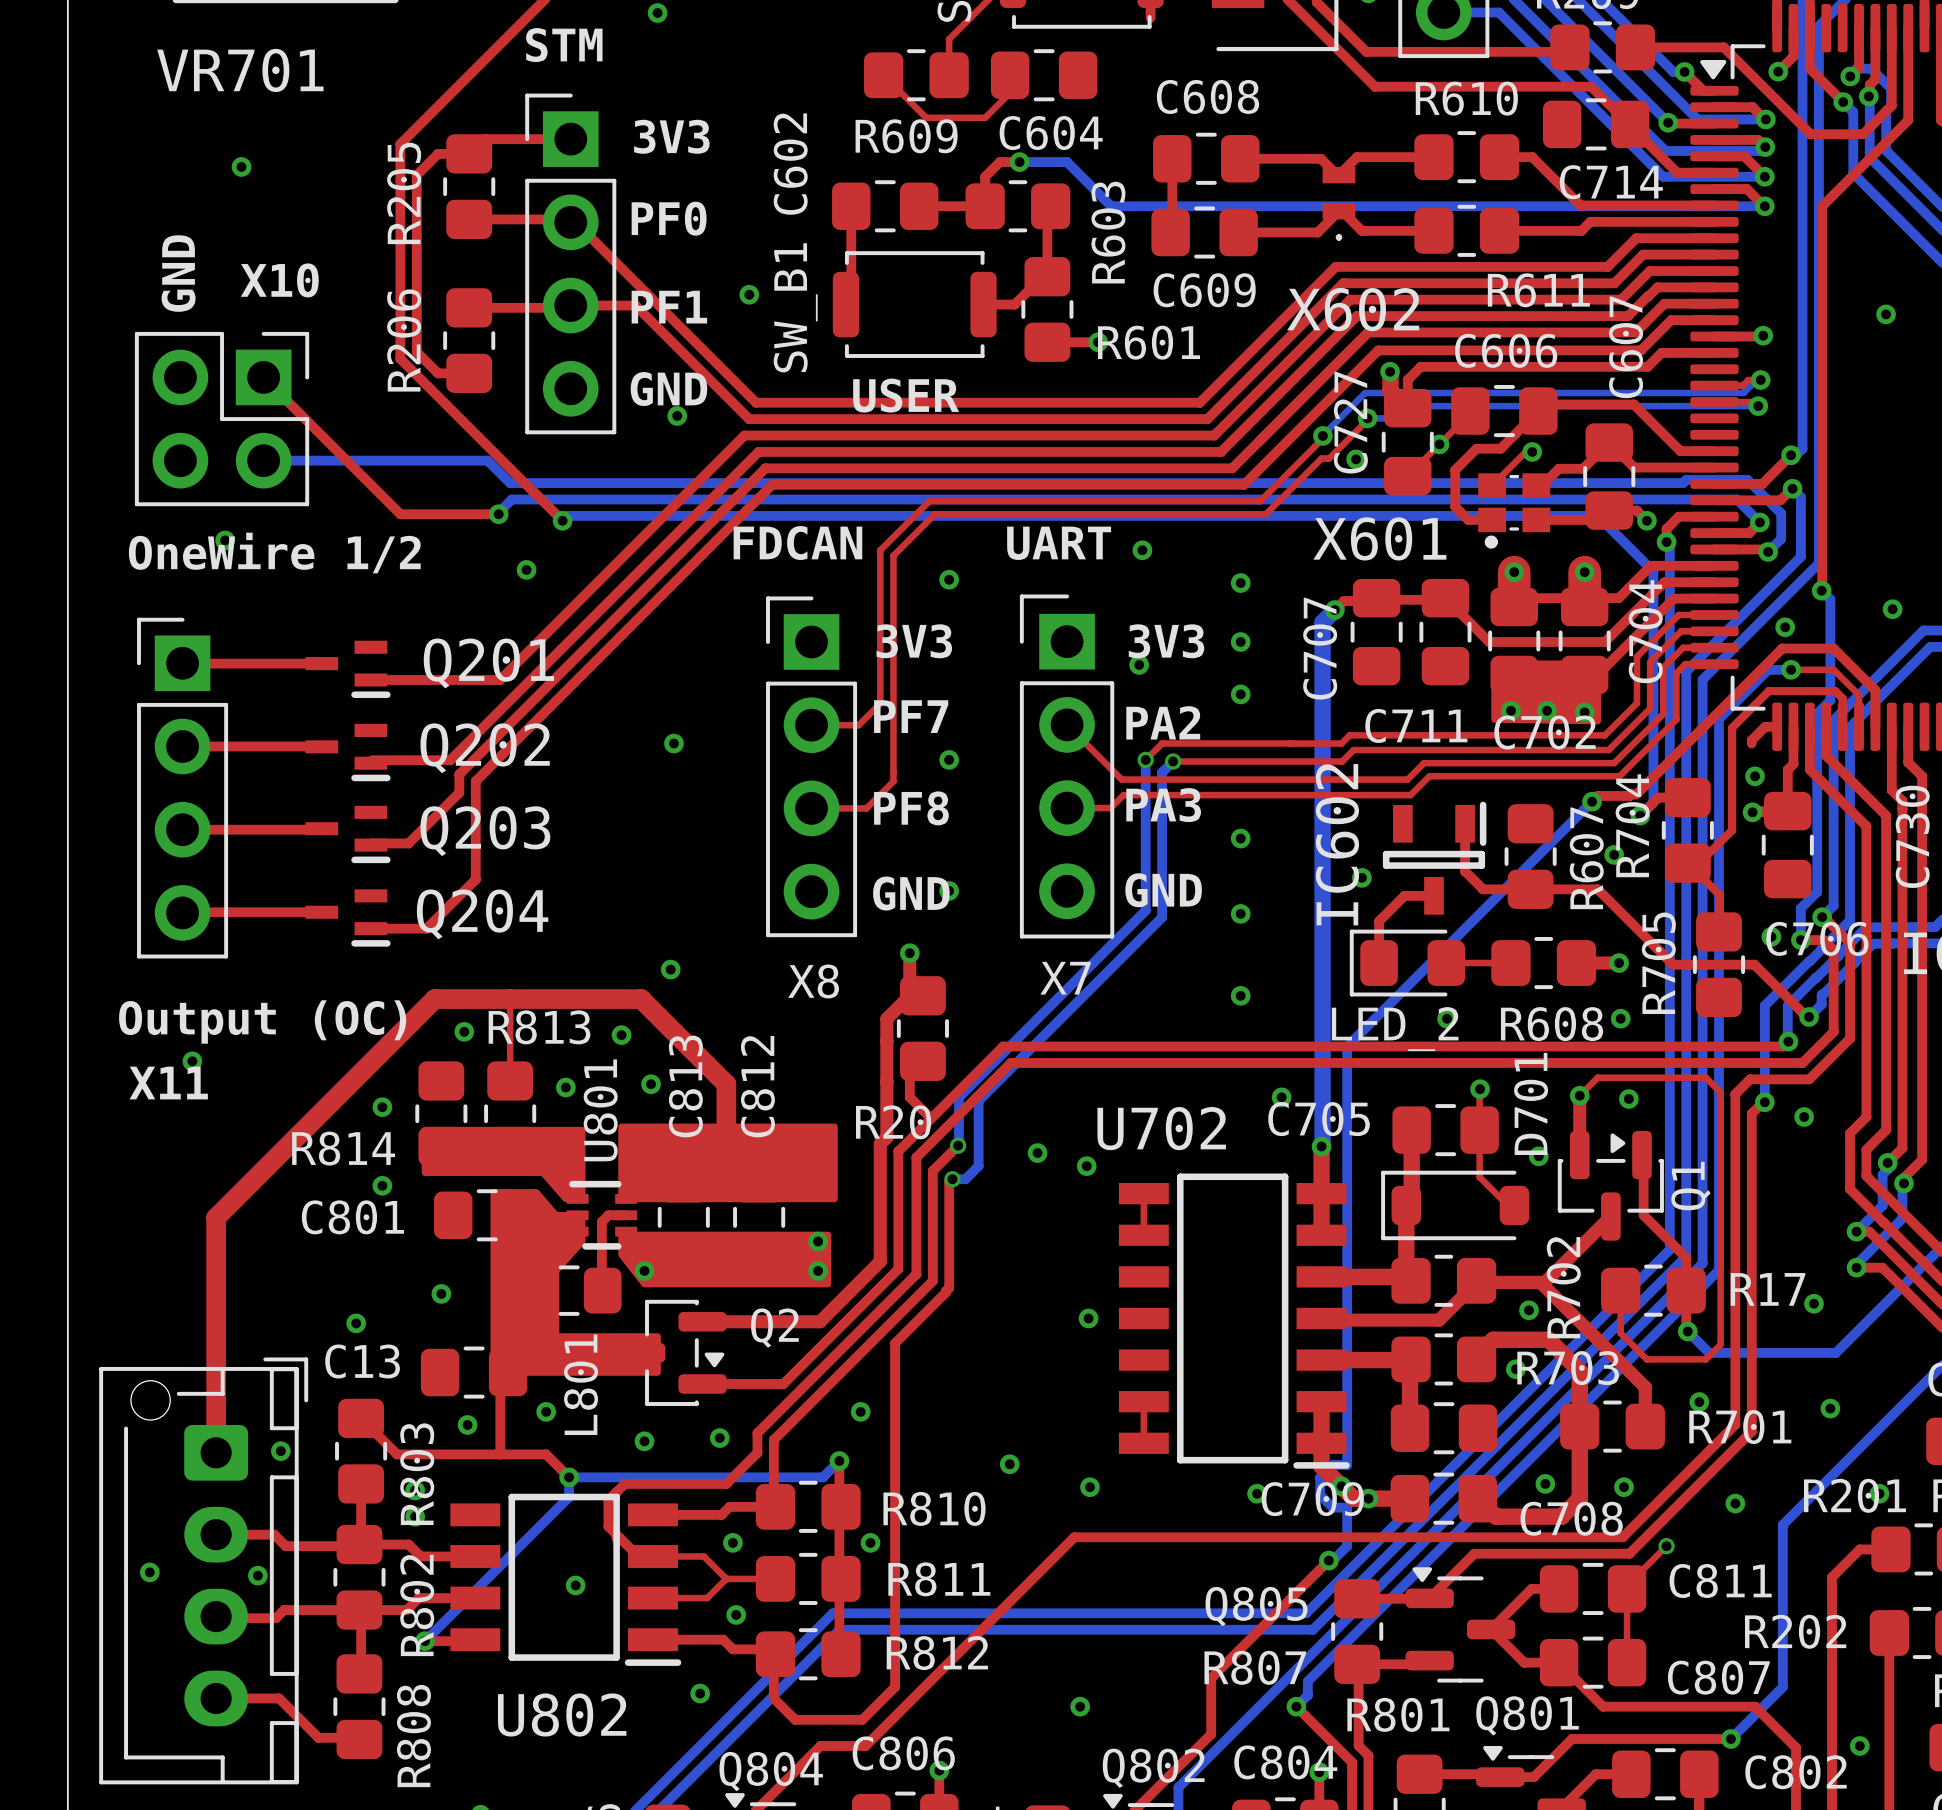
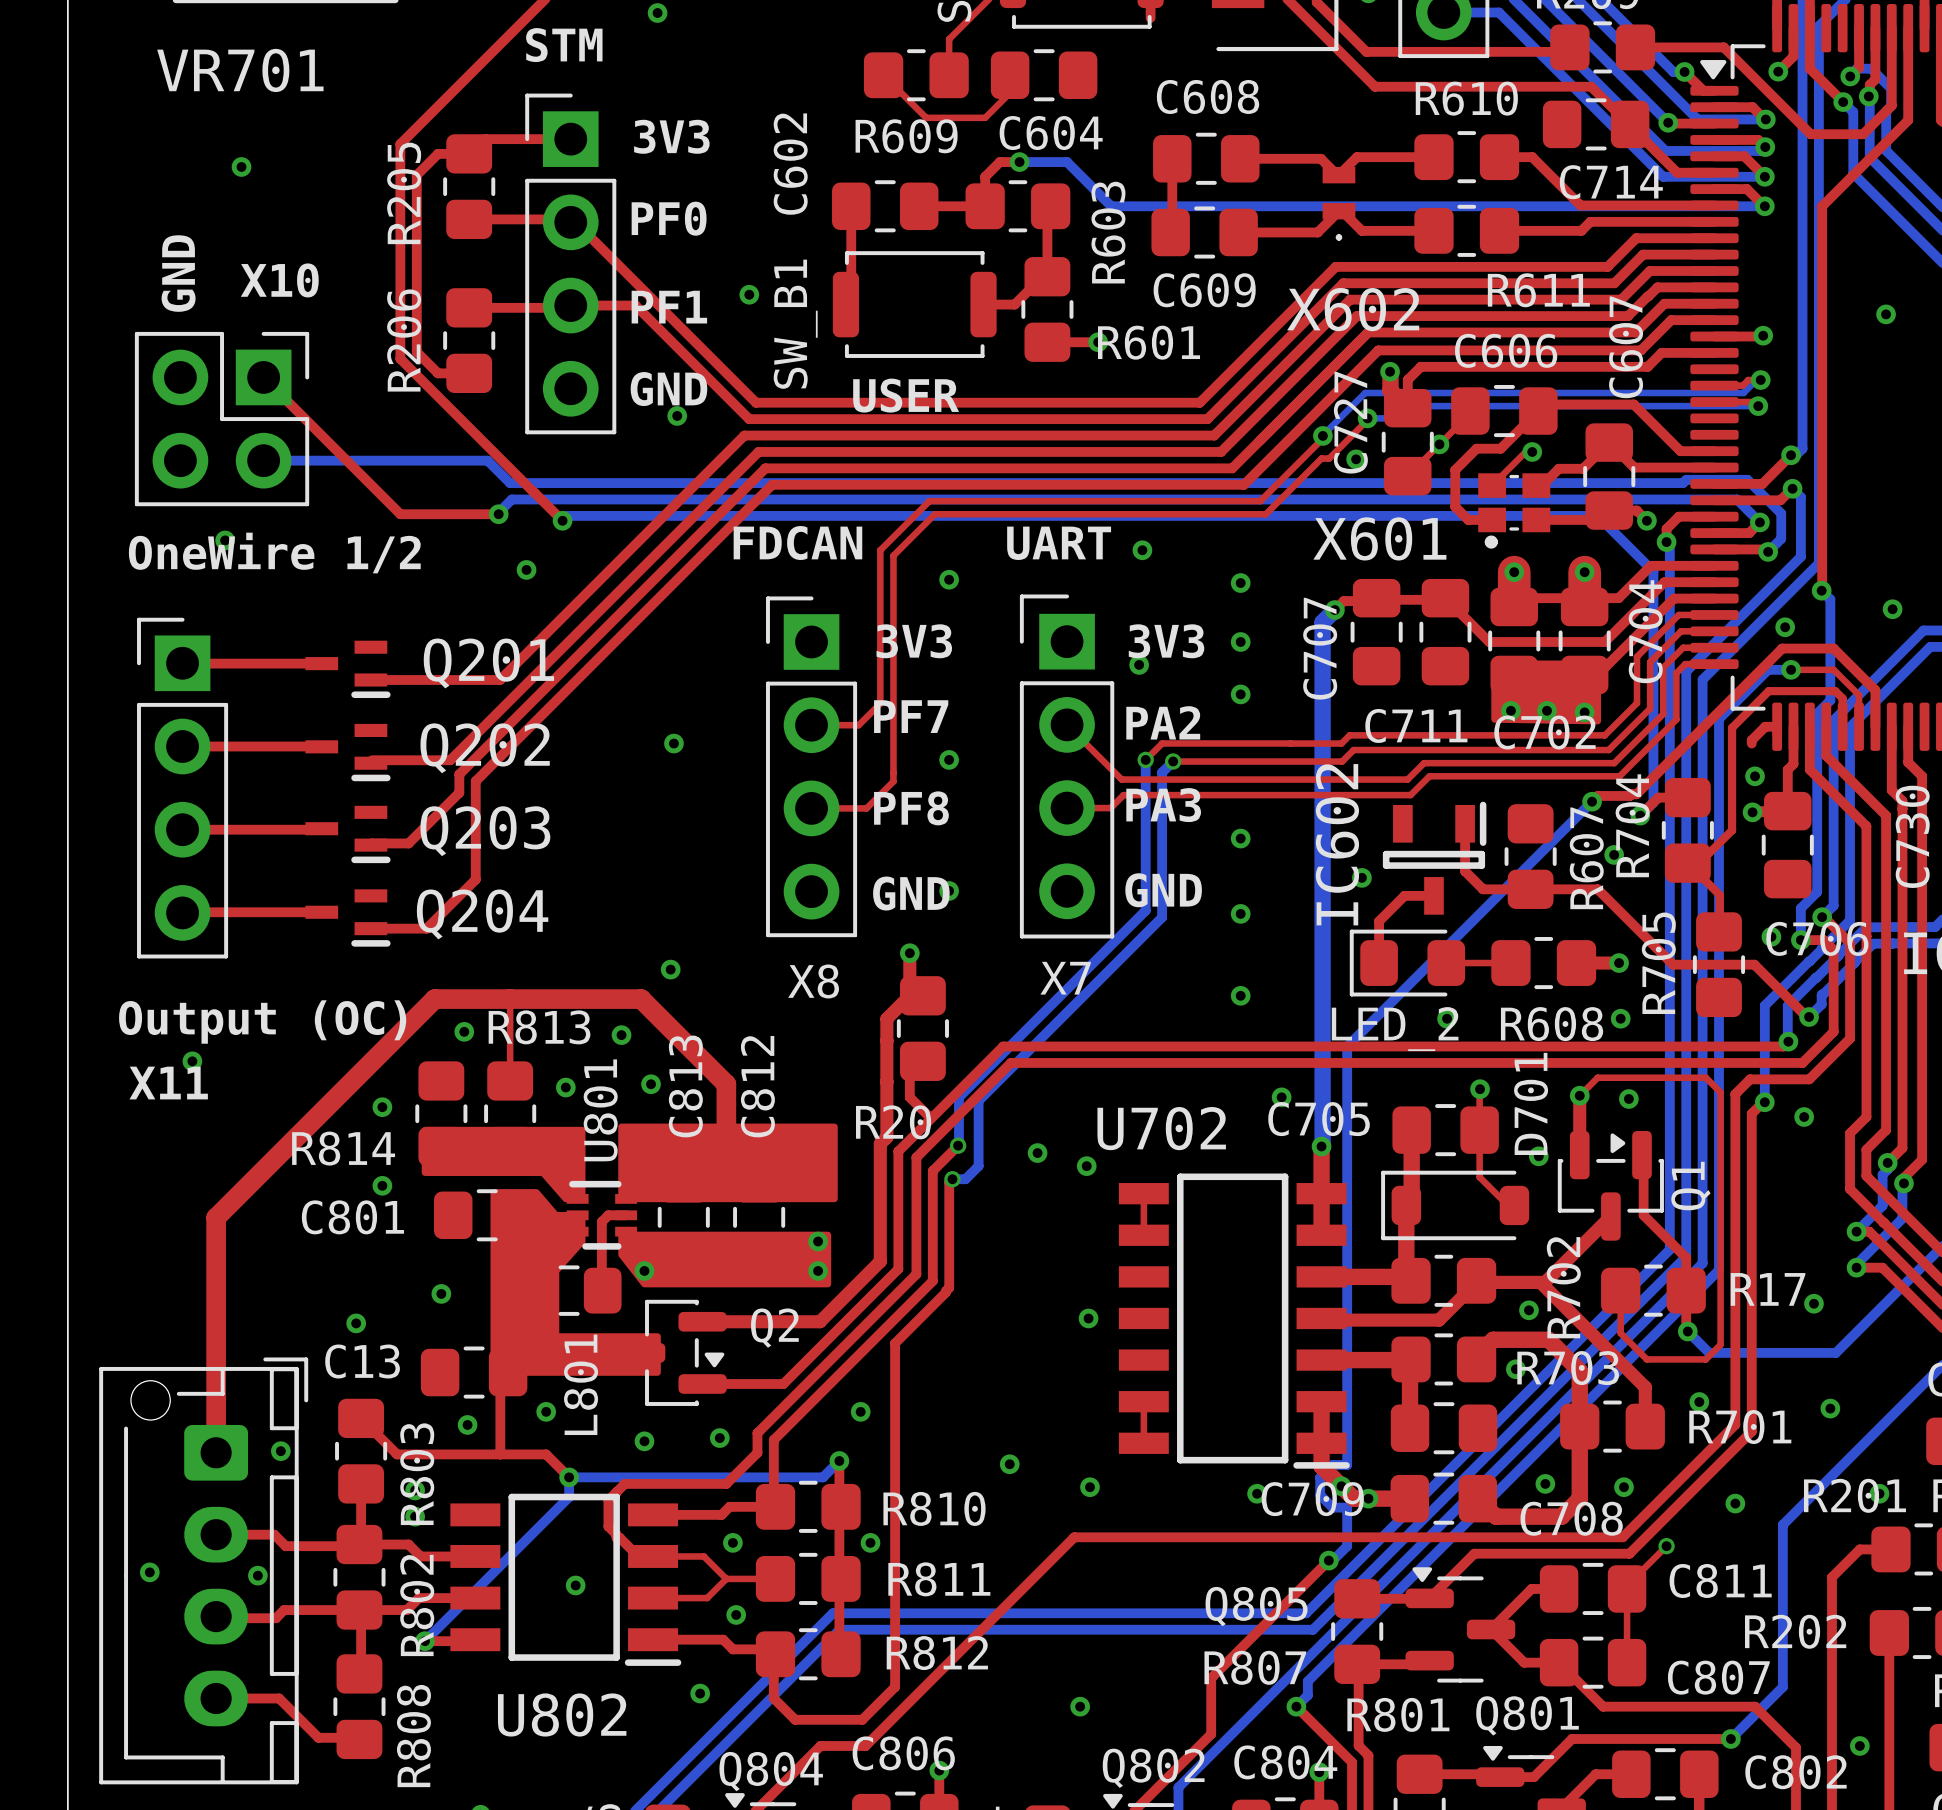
SW_B1 name position: SW_B1 (795, 307) -> SW_B1 (795, 324)

